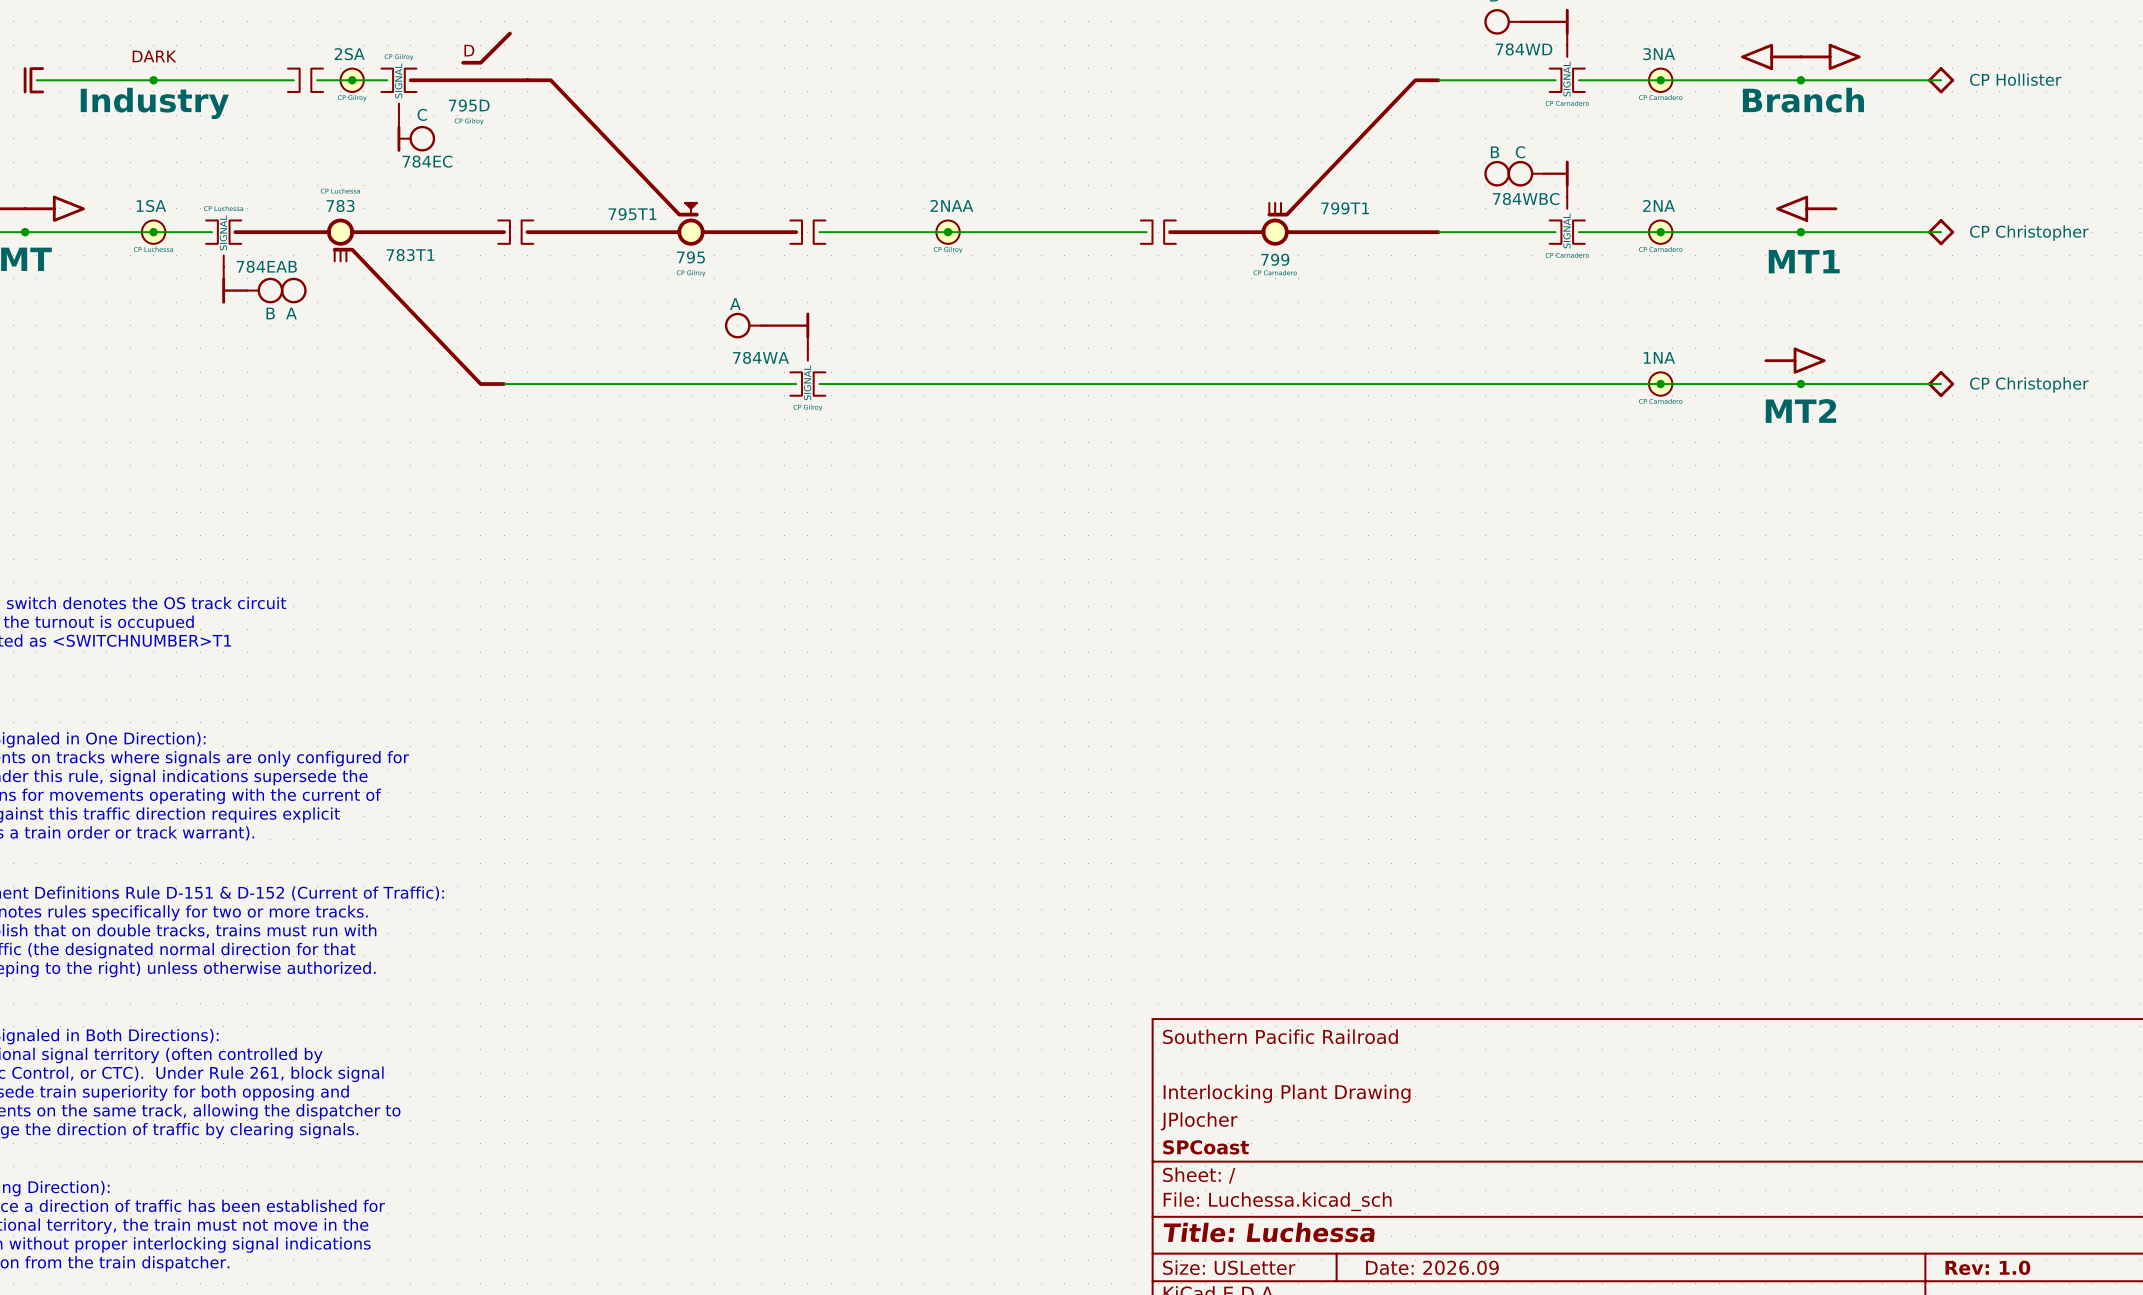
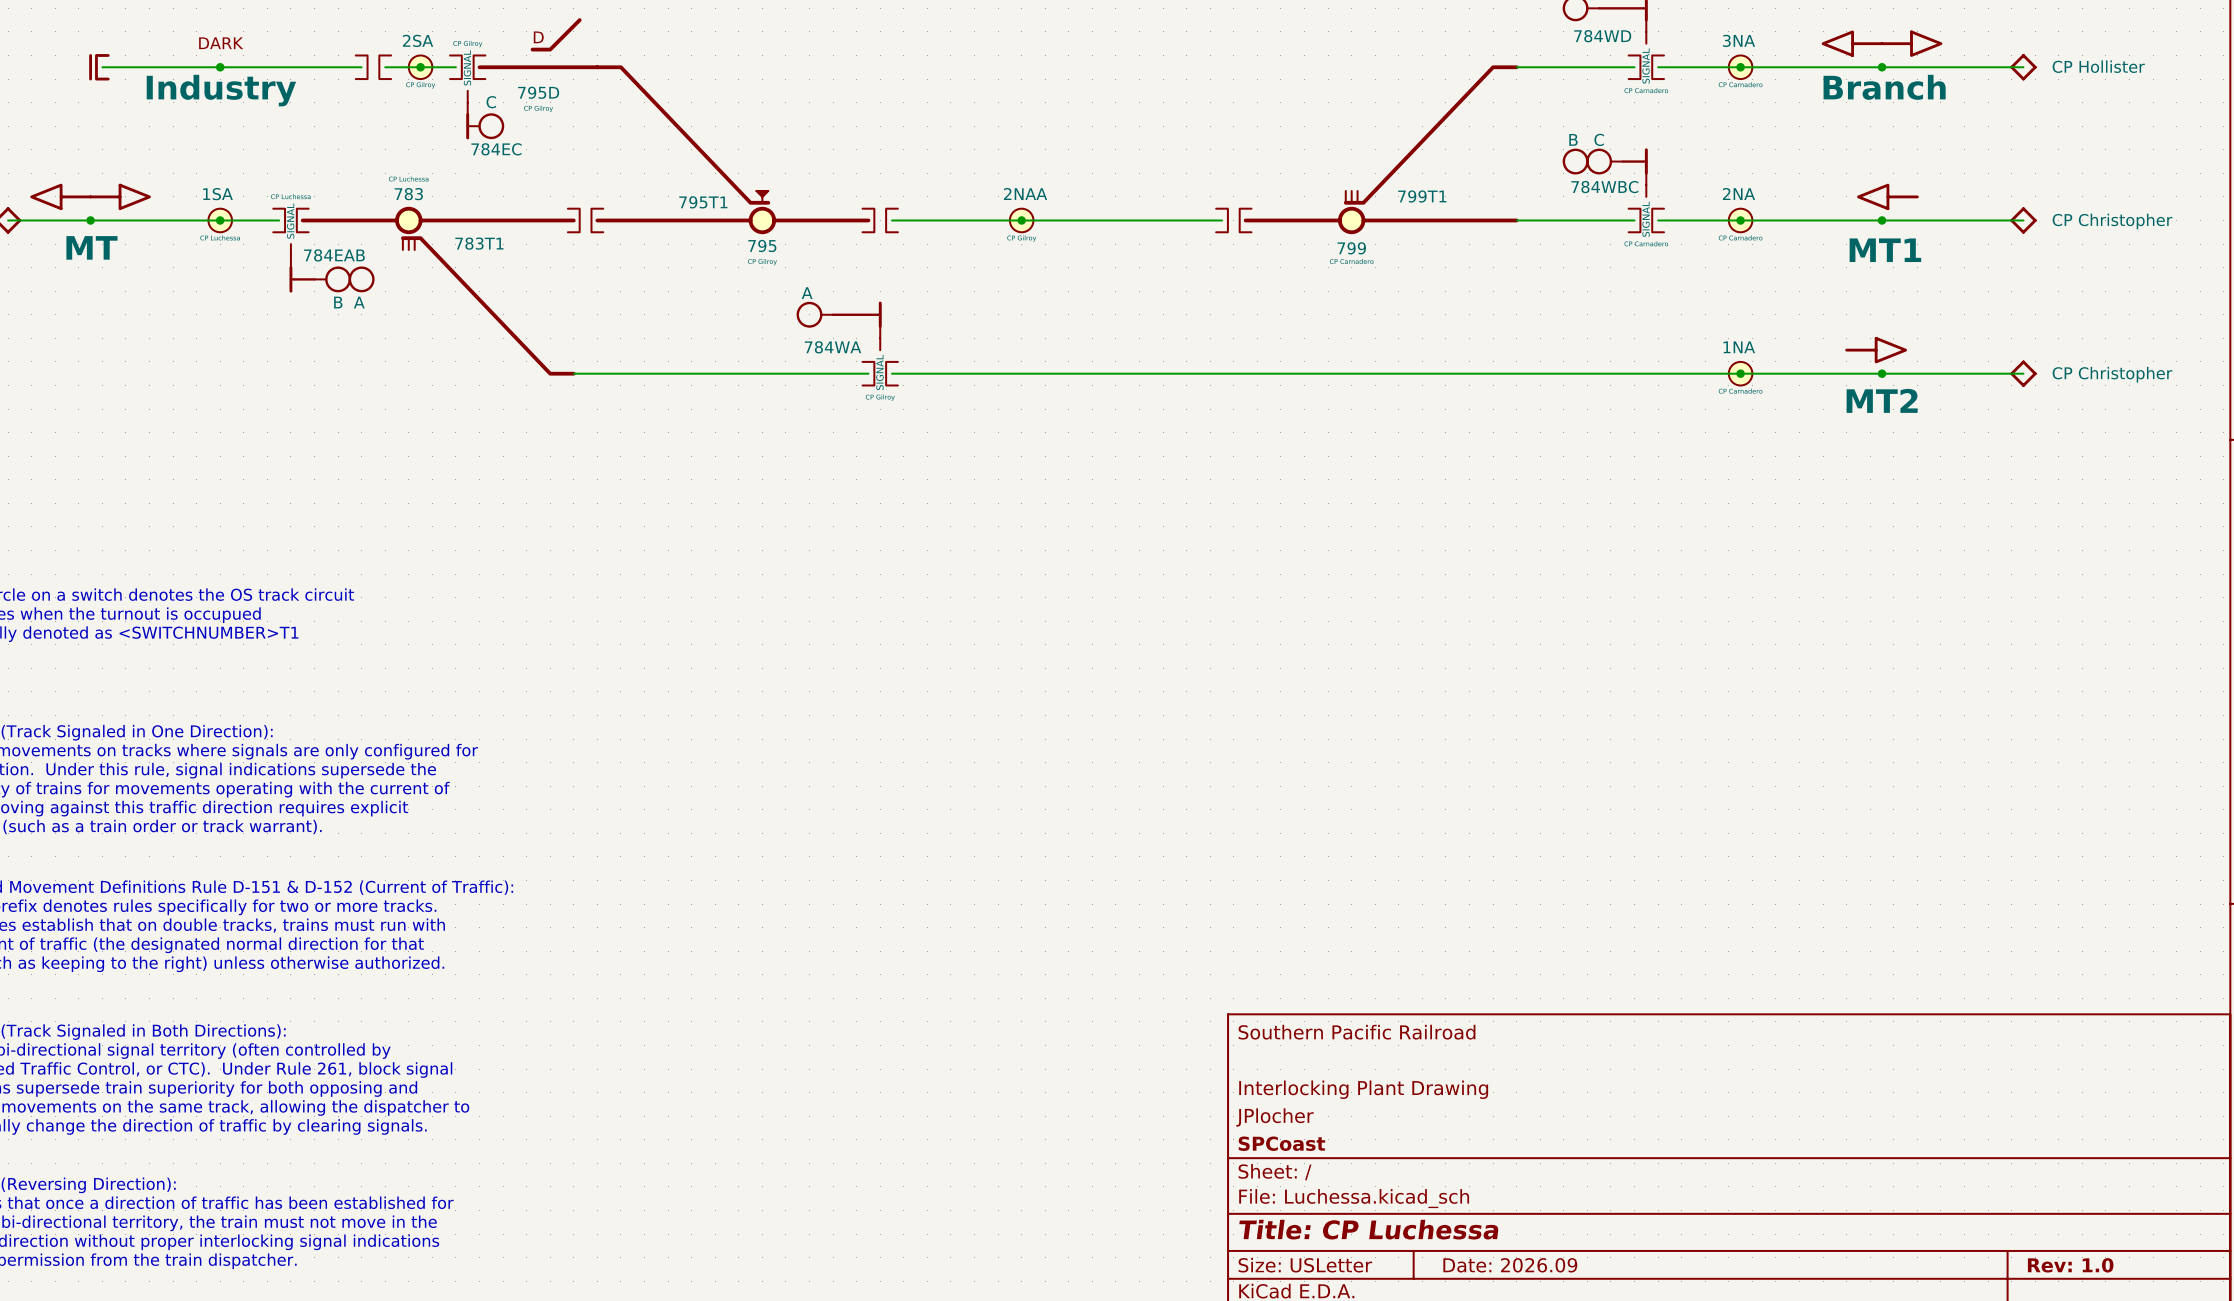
title block: Title: Luchessa (1269, 1232) -> Title: CP Luchessa (1368, 1229)

